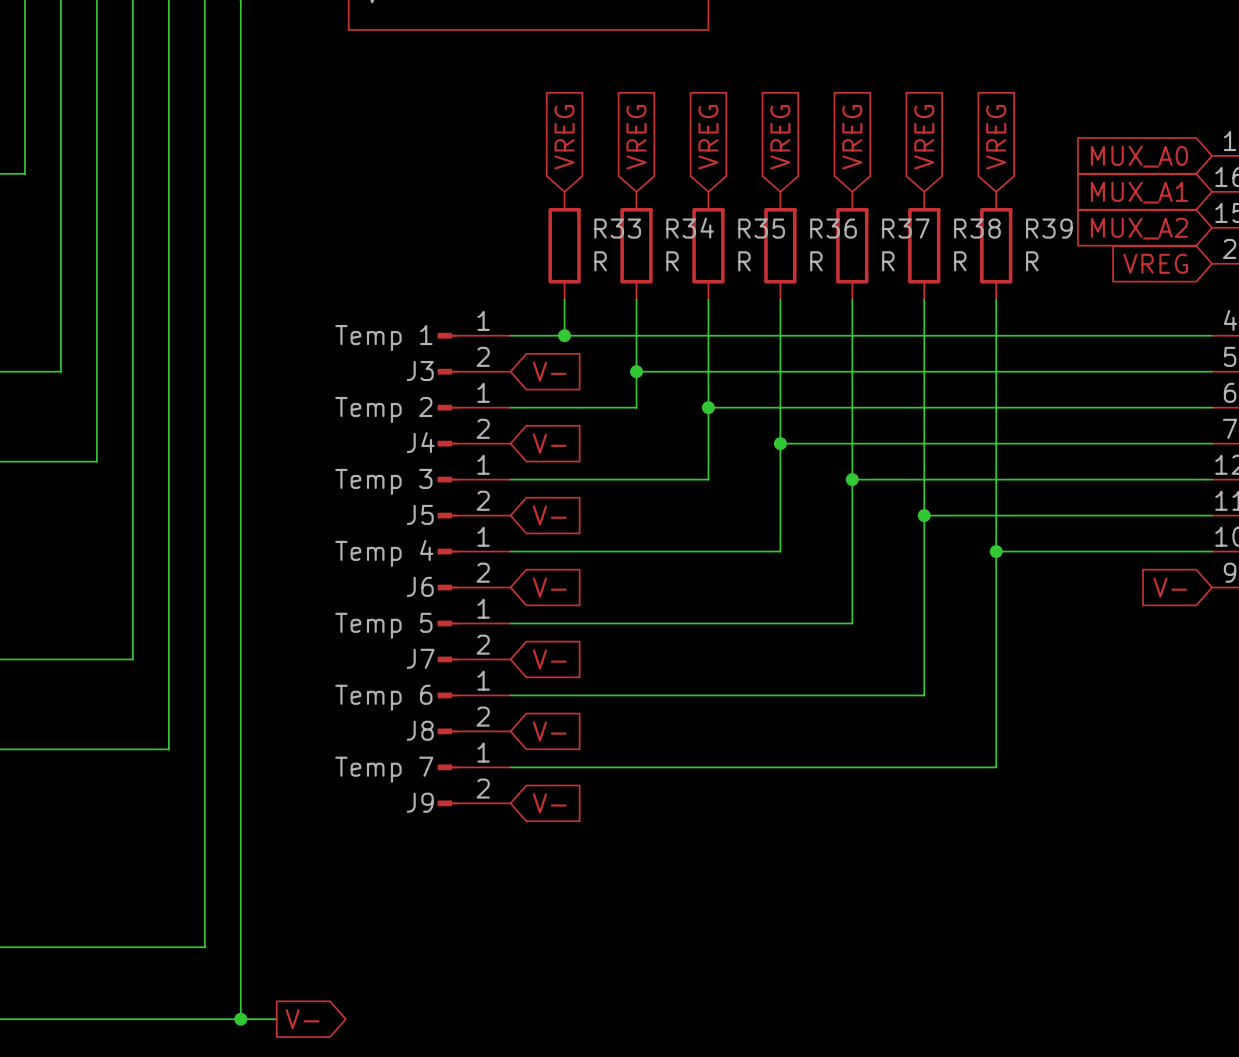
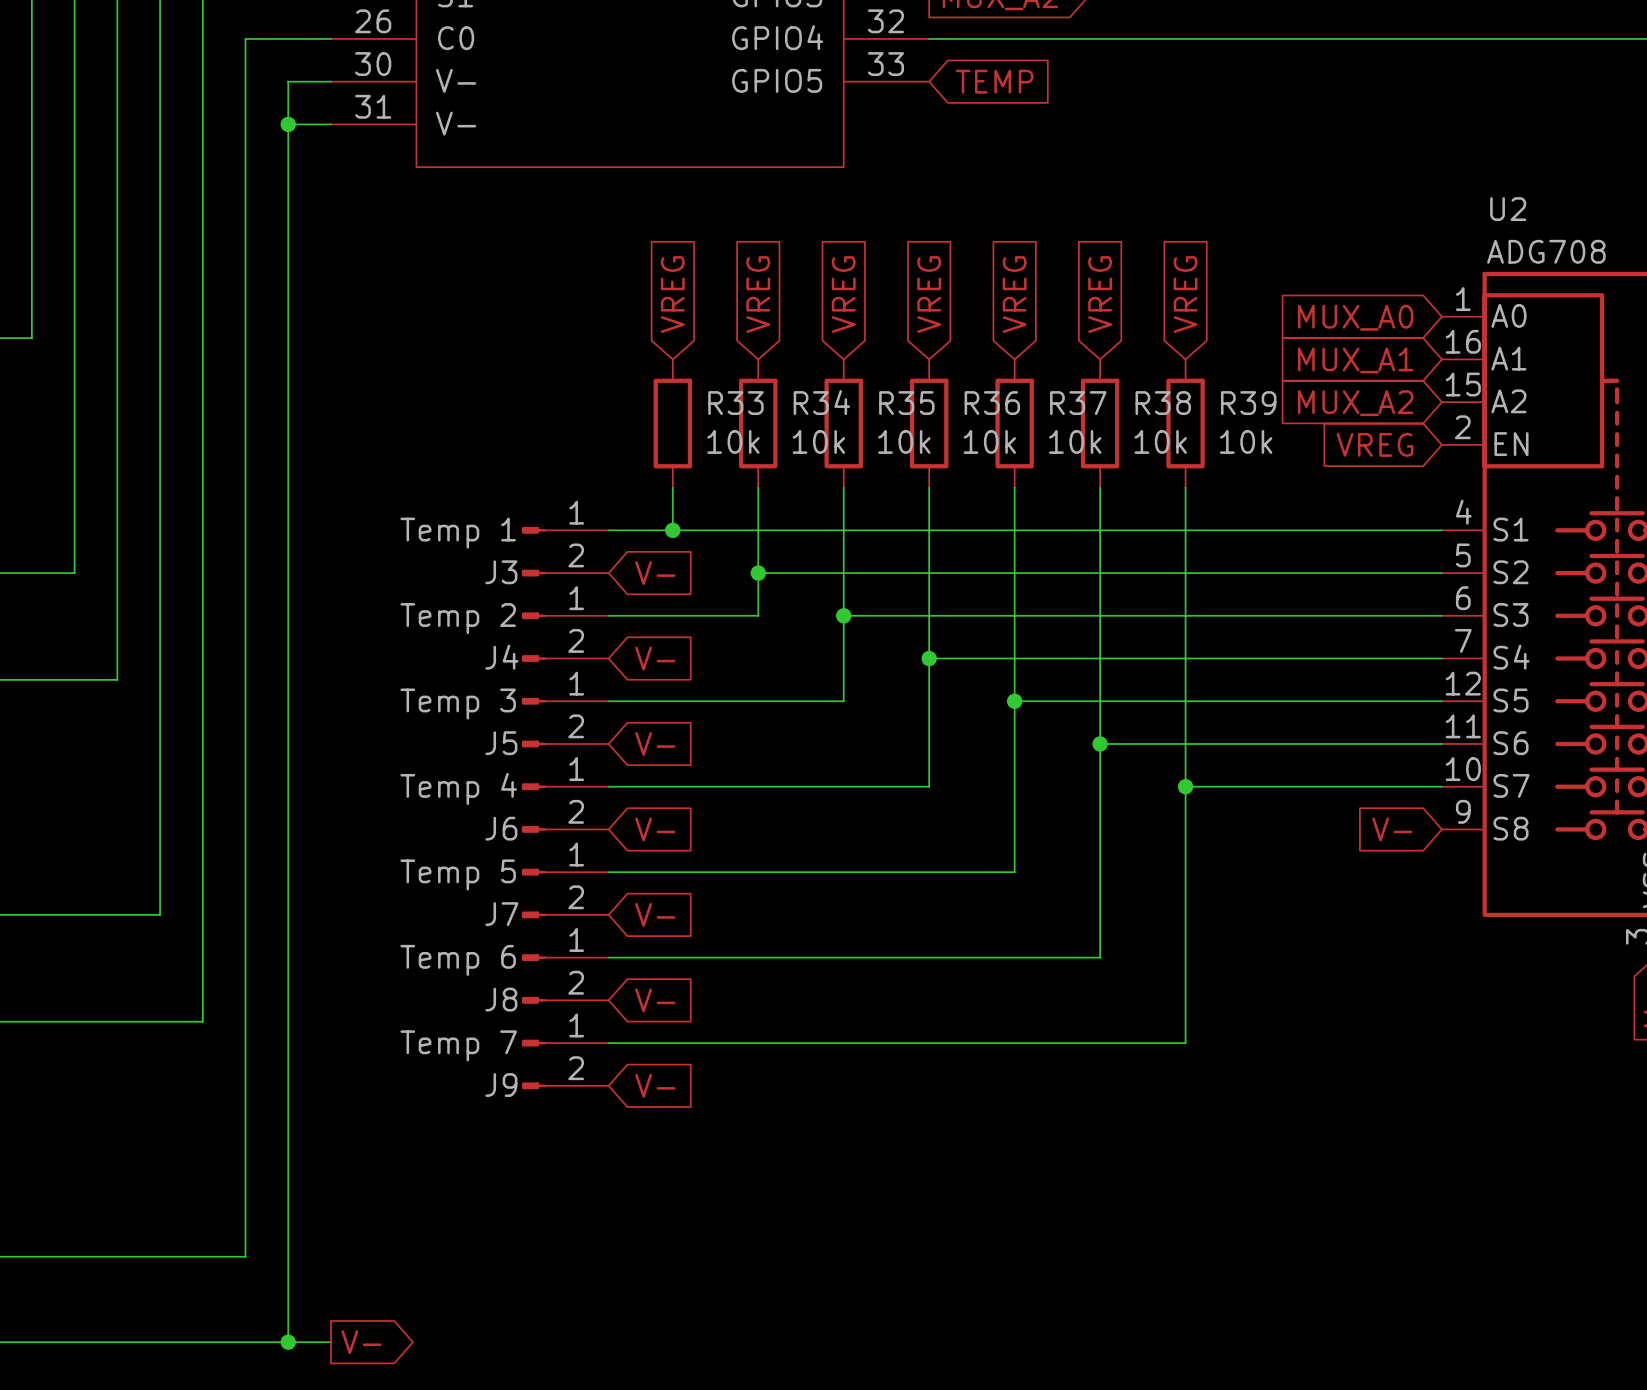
R33 value: R (600, 261) -> 10k (733, 441)
R34 value: R (672, 261) -> 10k (818, 441)
R35 value: R (744, 261) -> 10k (904, 441)
R36 value: R (816, 261) -> 10k (989, 441)
R37 value: R (888, 261) -> 10k (1075, 441)
R38 value: R (960, 261) -> 10k (1160, 441)
R39 value: R (1032, 261) -> 10k (1246, 441)

